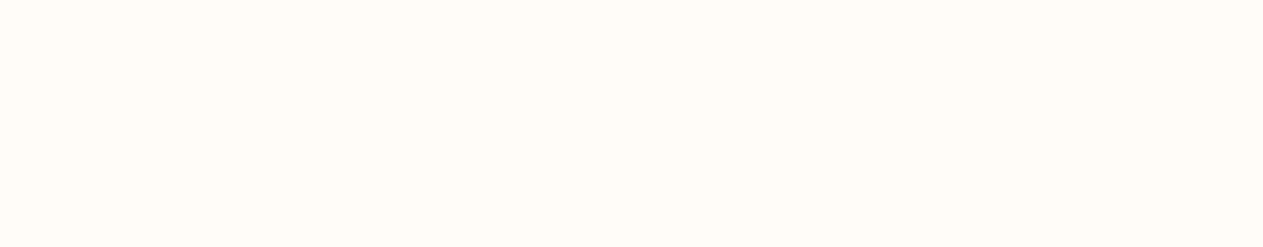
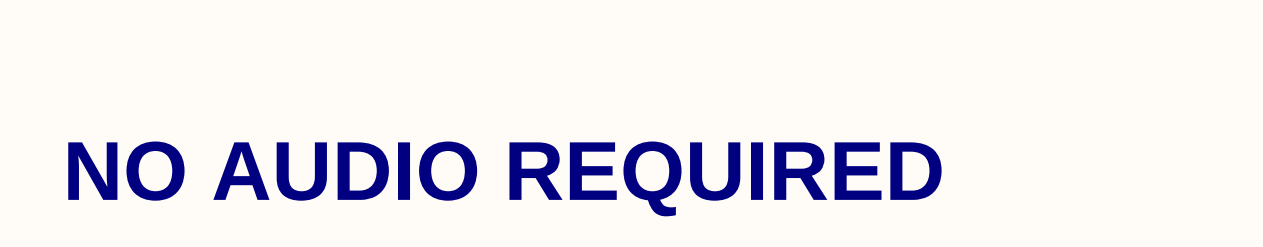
text: none -> NO AUDIO REQUIRED (504, 178)

